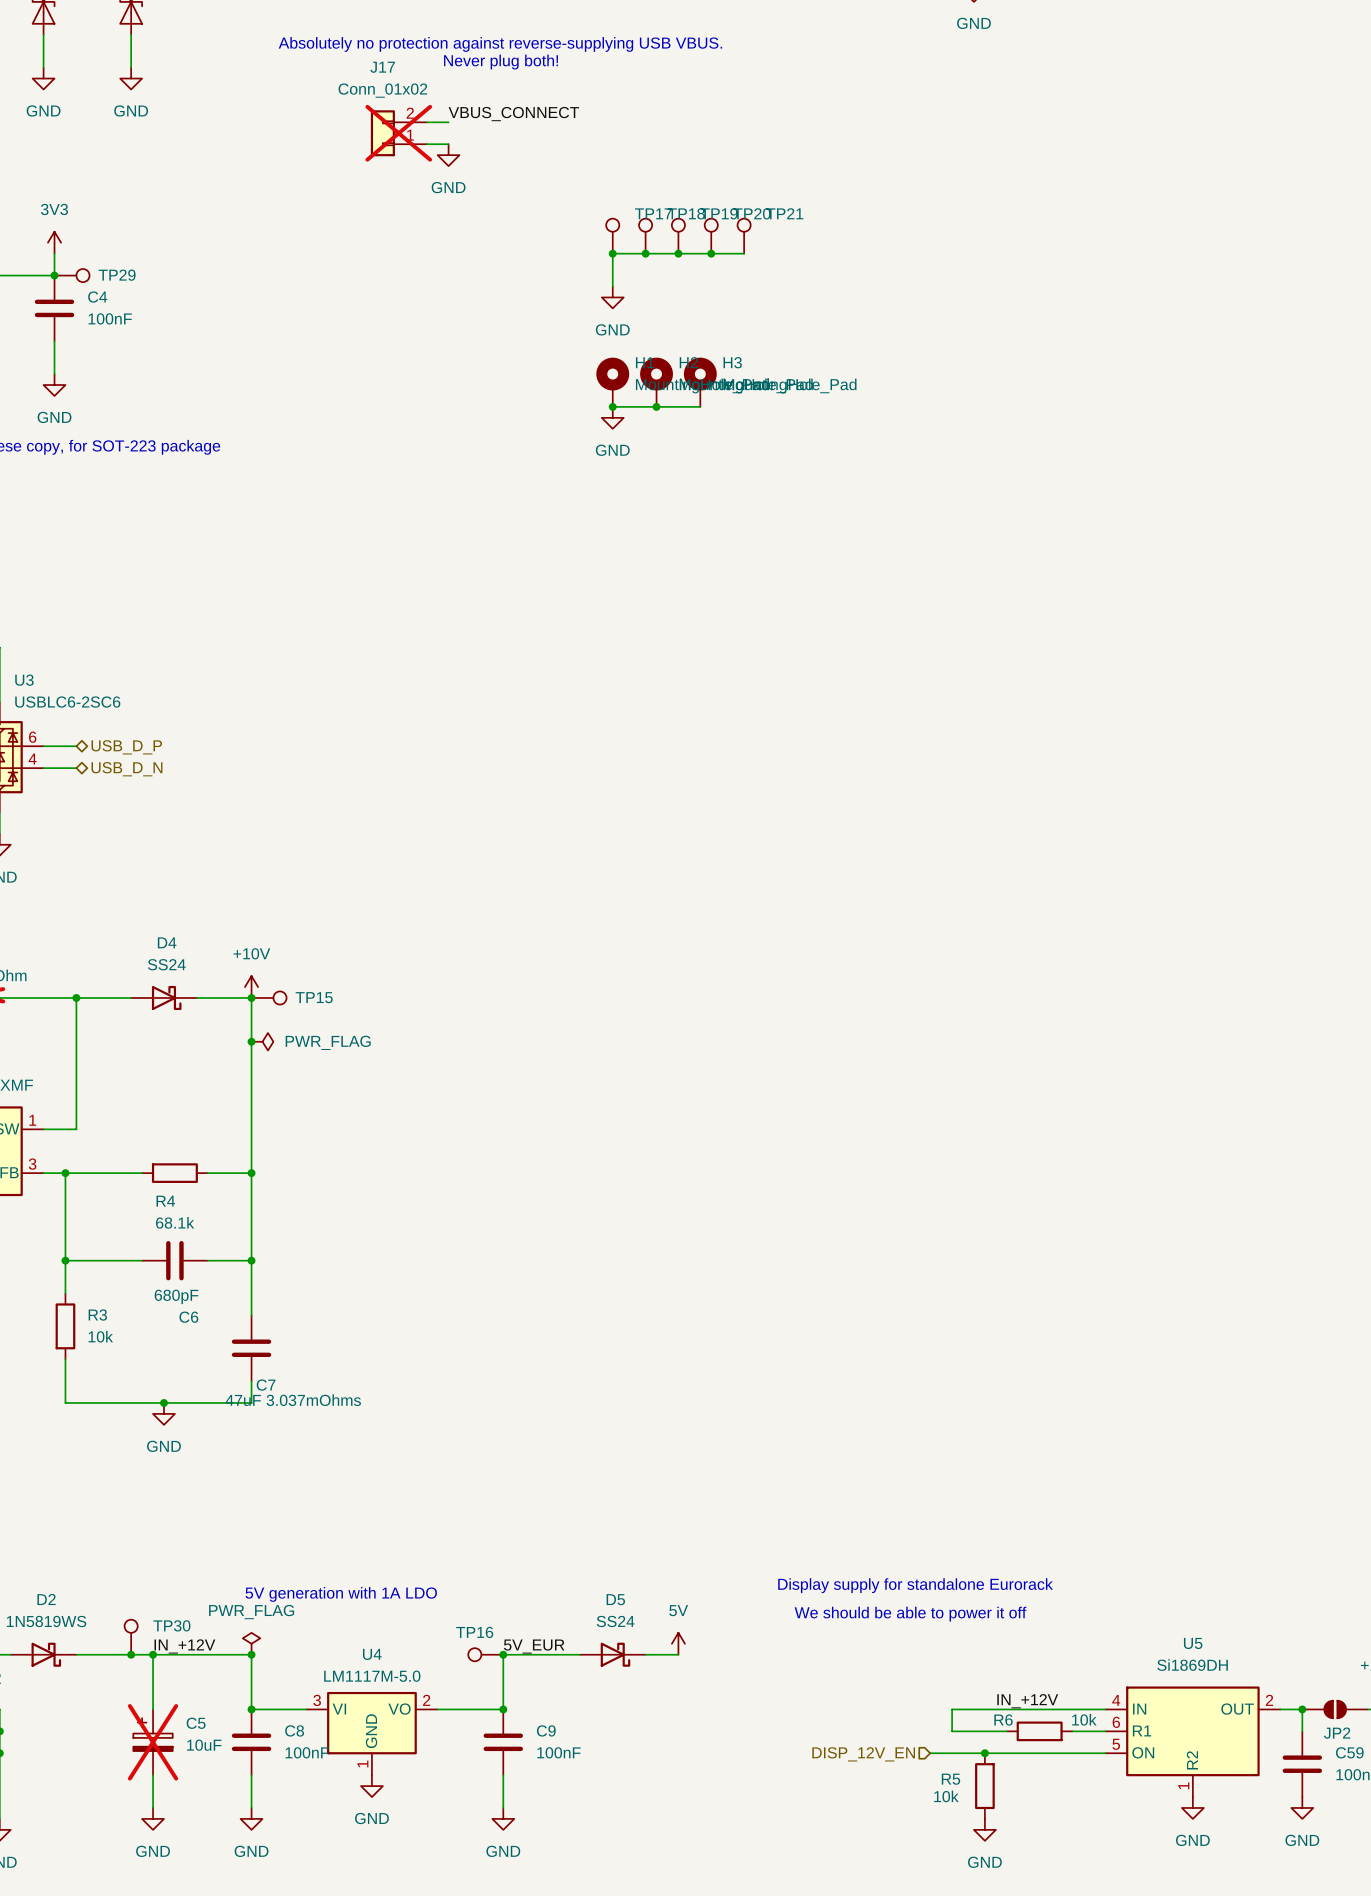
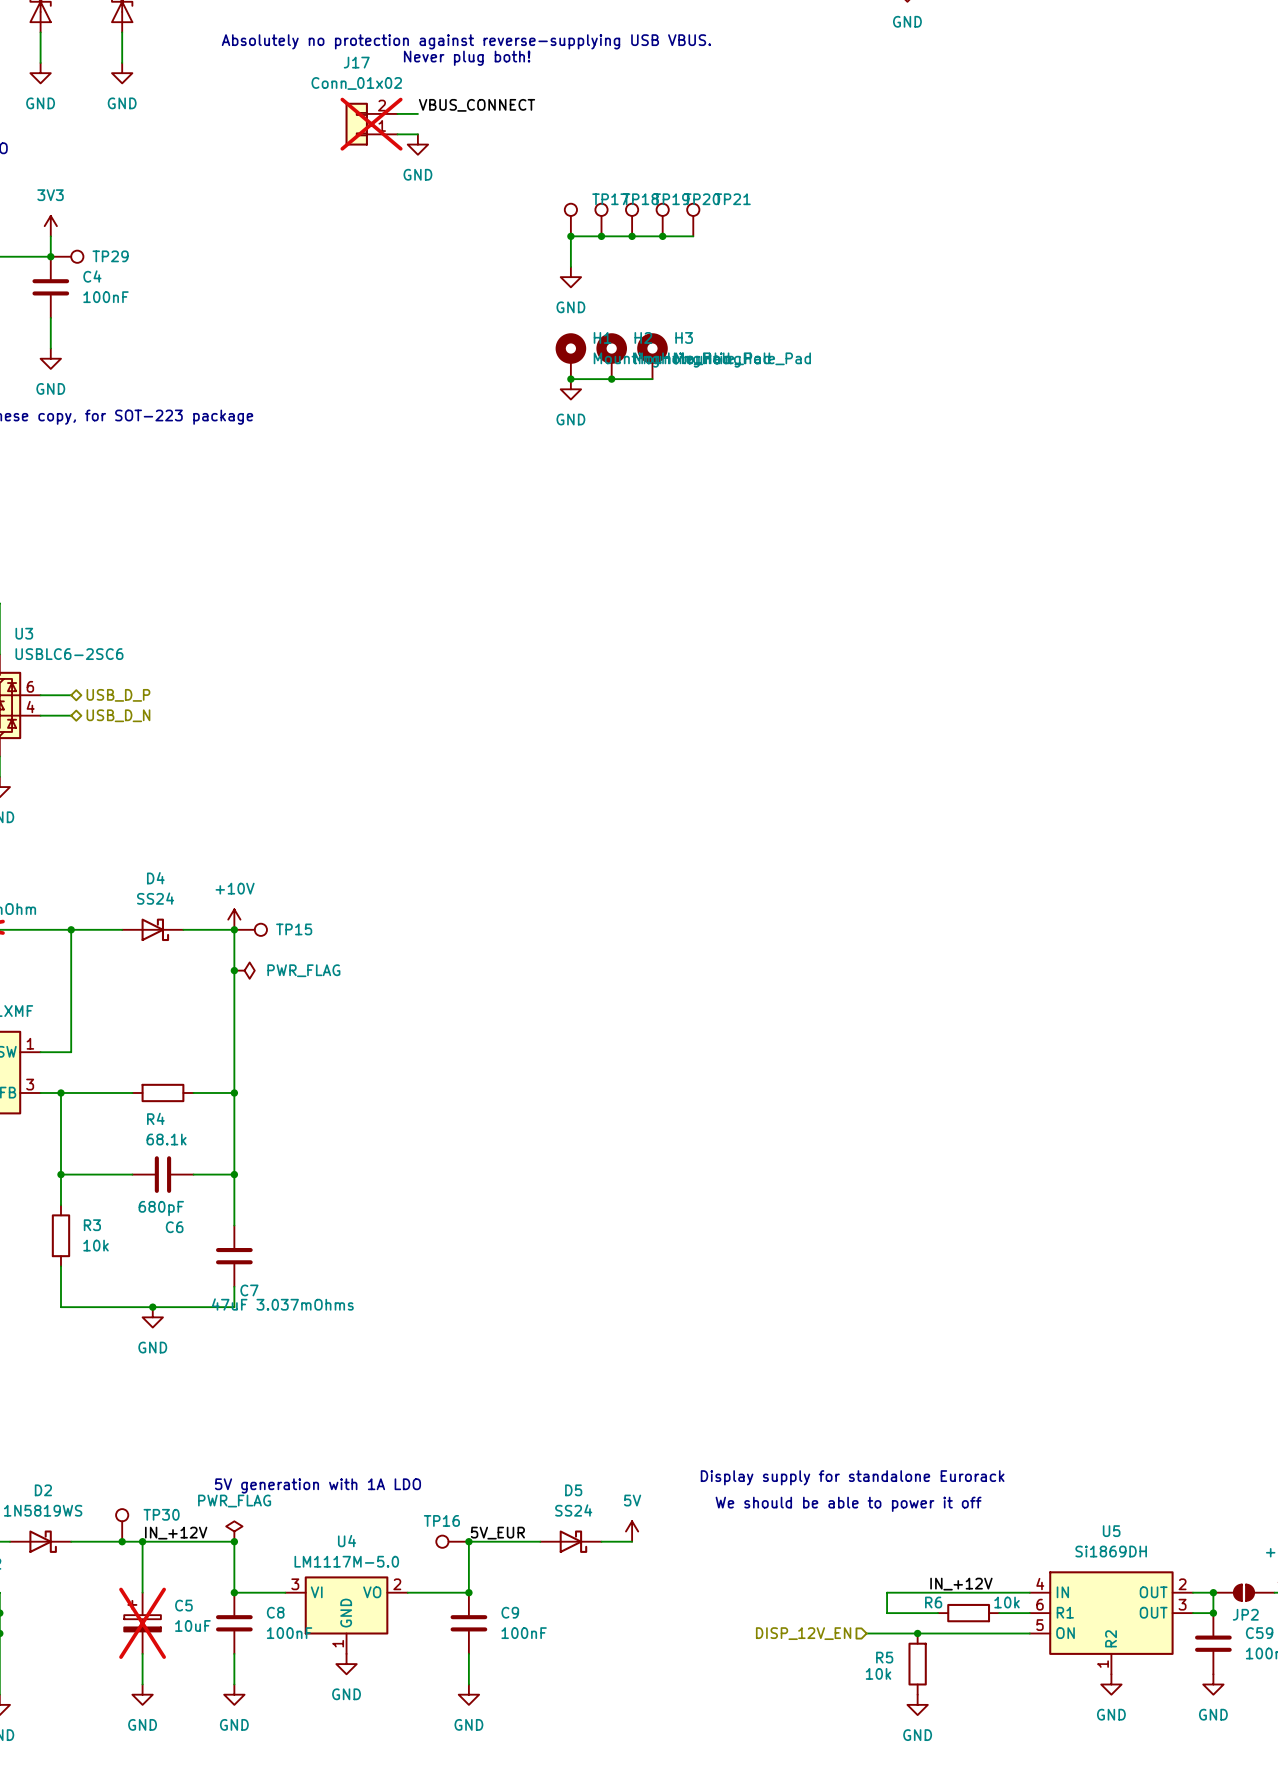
U5 symbol: [1105, 1686, 1281, 1798] -> [1029, 1571, 1193, 1675]
wire: none -> (1192, 1613) (1213, 1613)
junction: none -> (1213, 1613)

